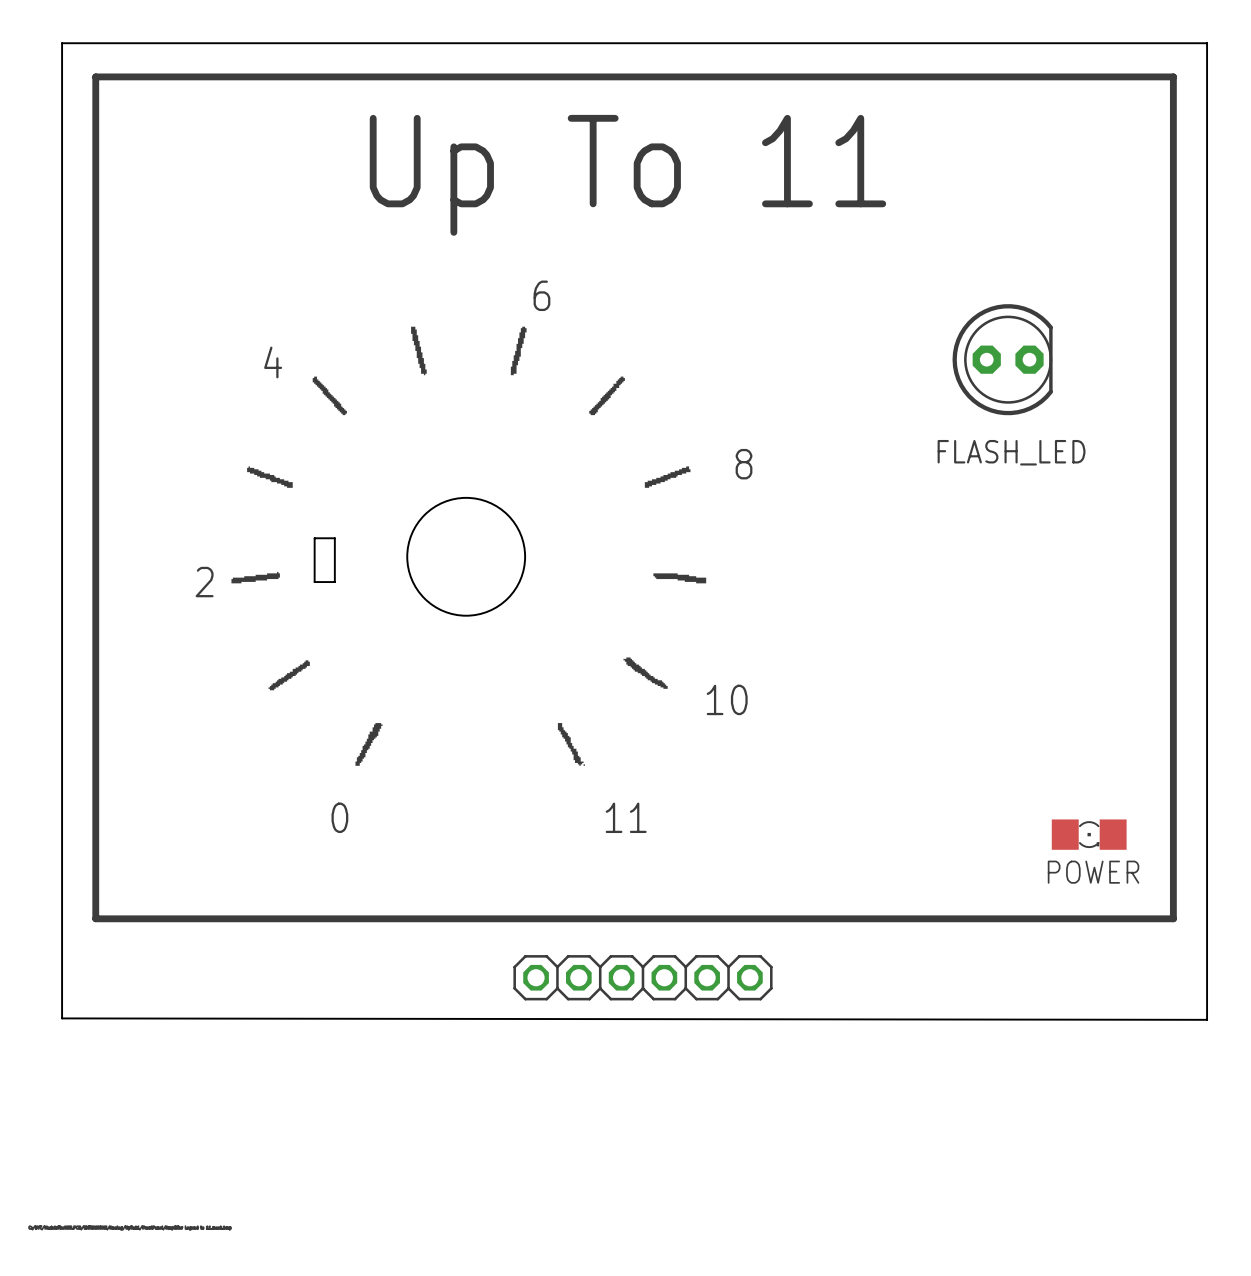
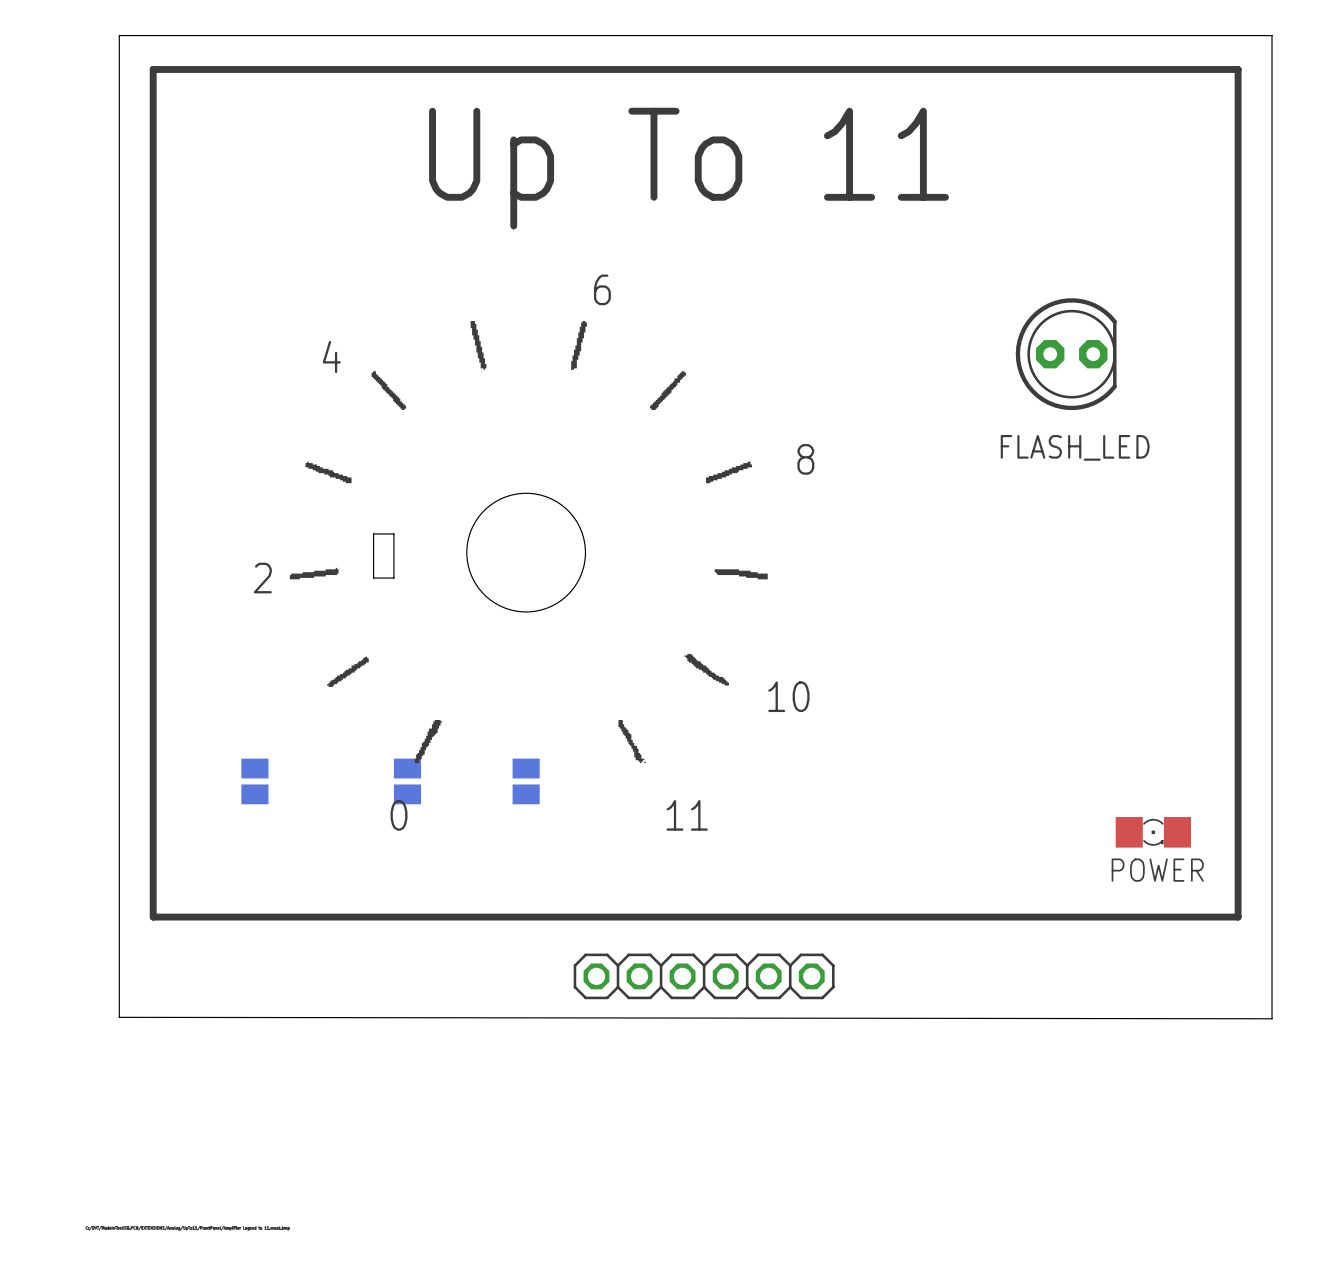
part: none -> (254, 781)
part: none -> (407, 781)
part: none -> (526, 781)

